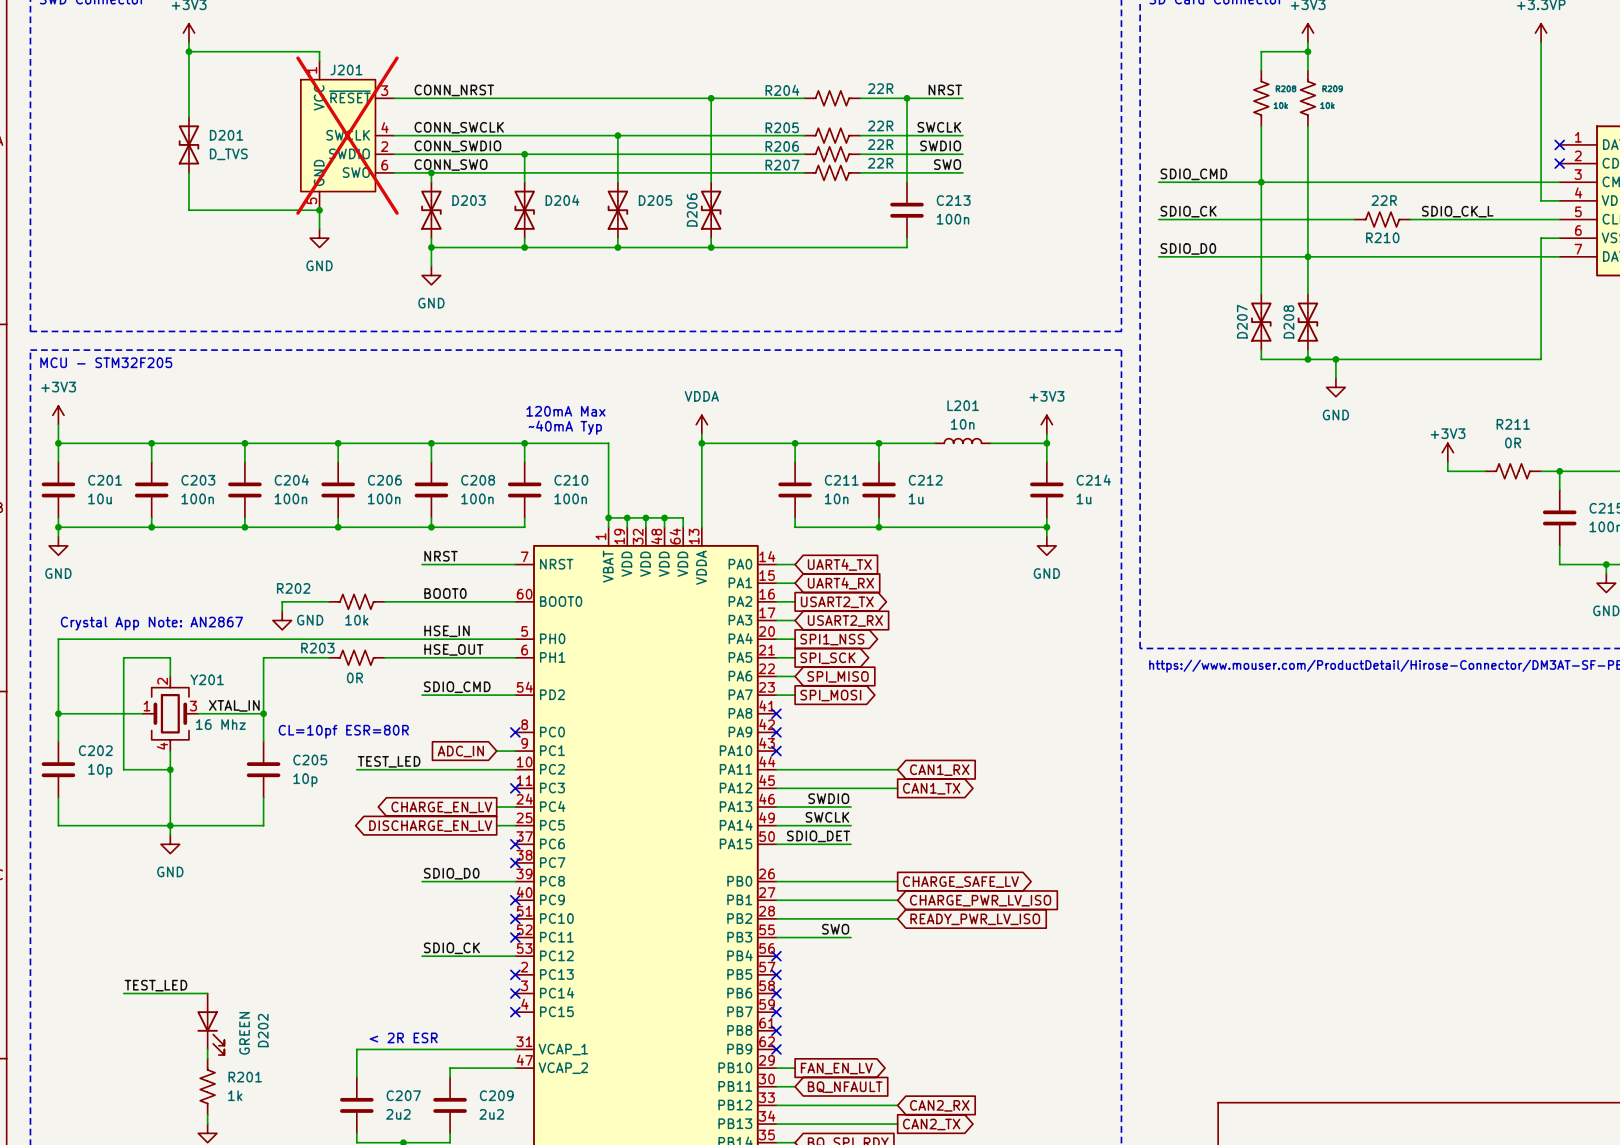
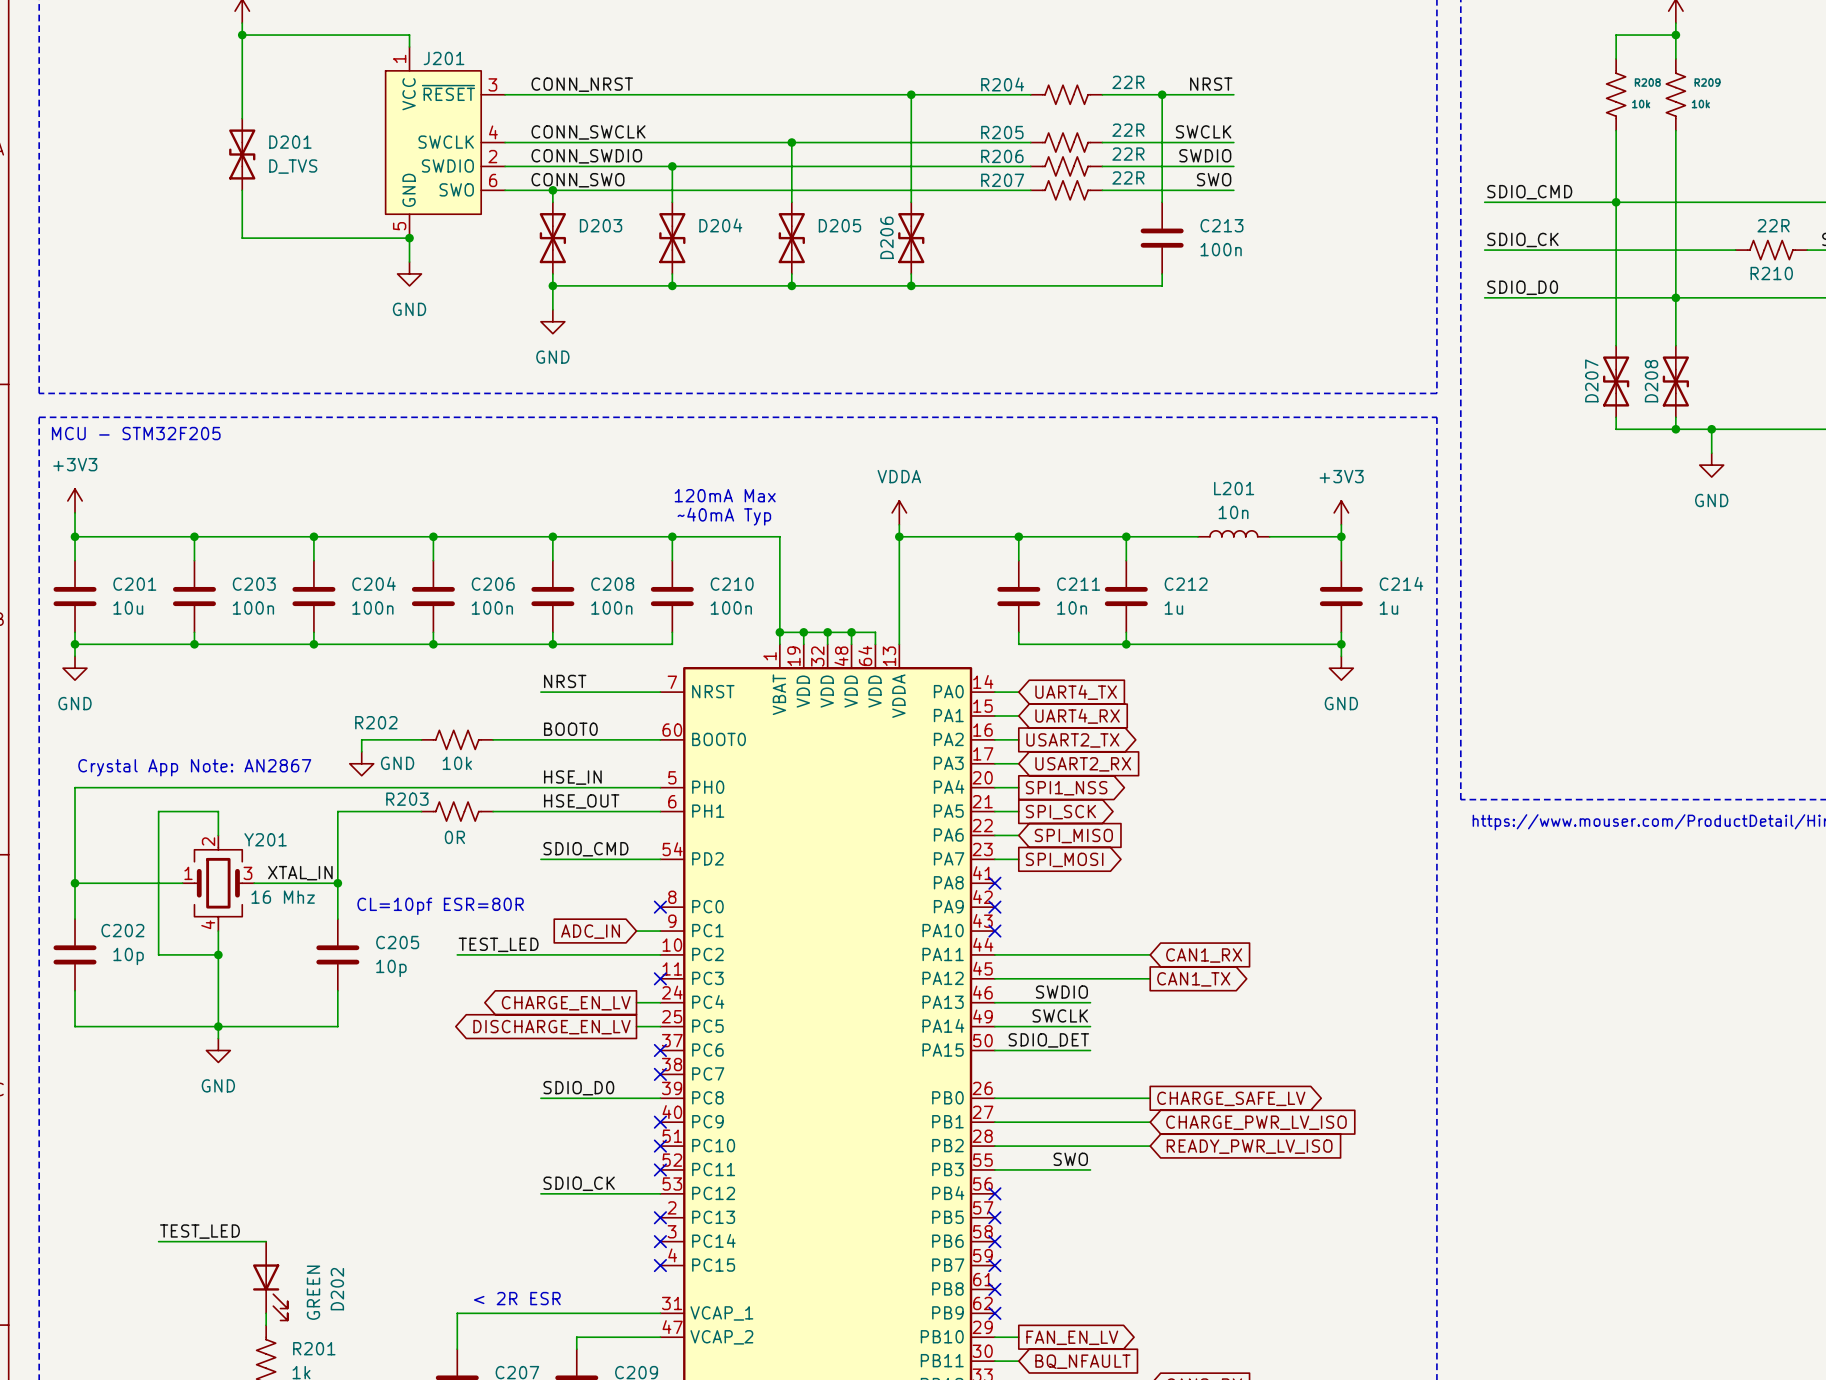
J201 do-not-place cross: (347, 135) -> none

